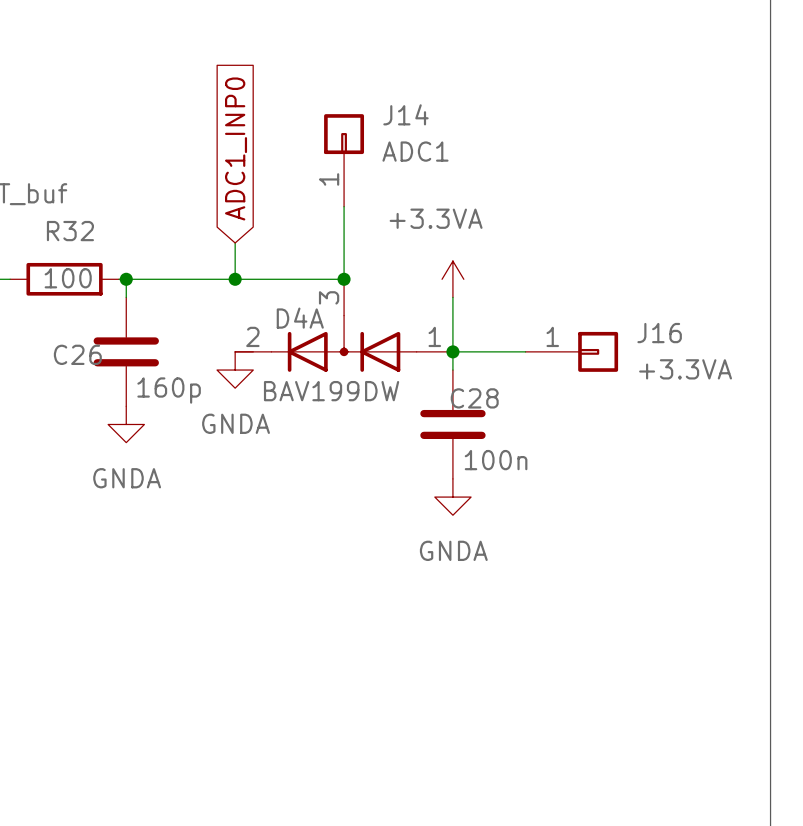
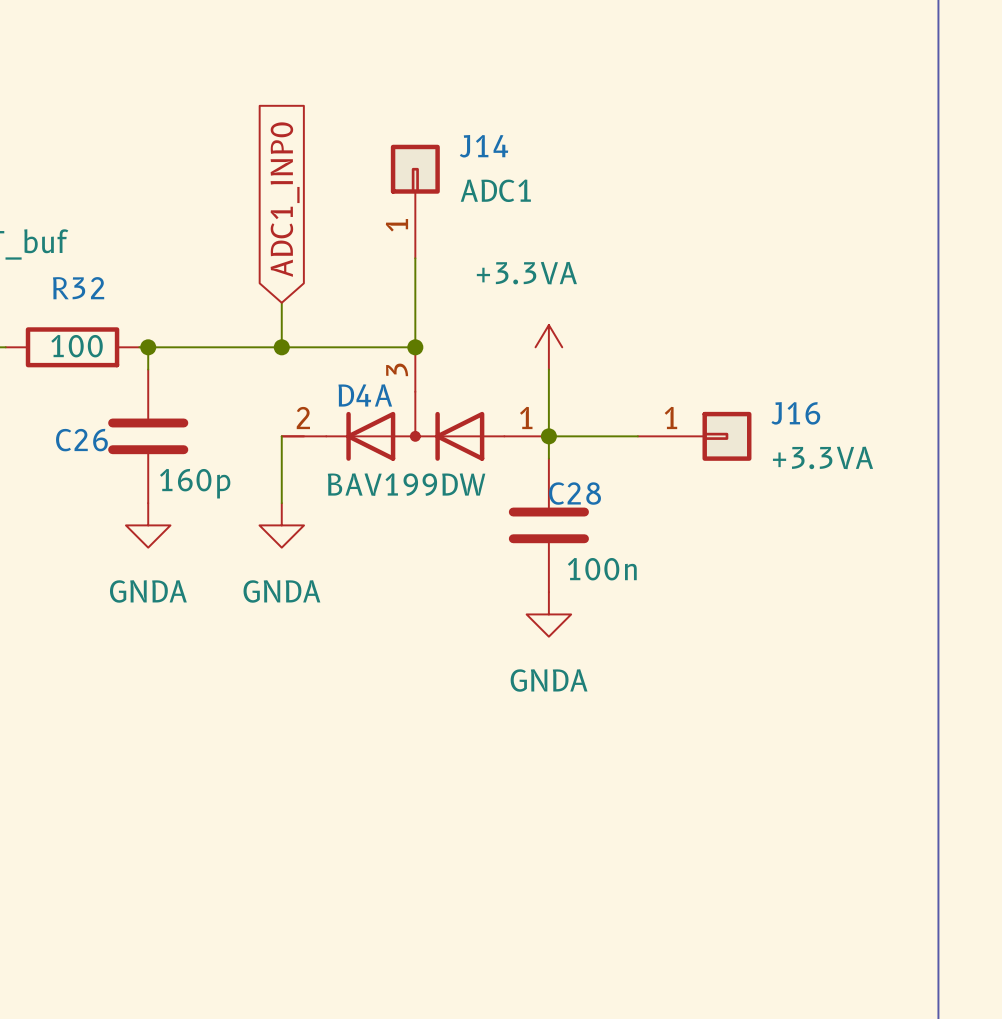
wire: none -> (281, 436) (281, 503)
power symbol position: GNDA (235, 370) -> GNDA (281, 525)

